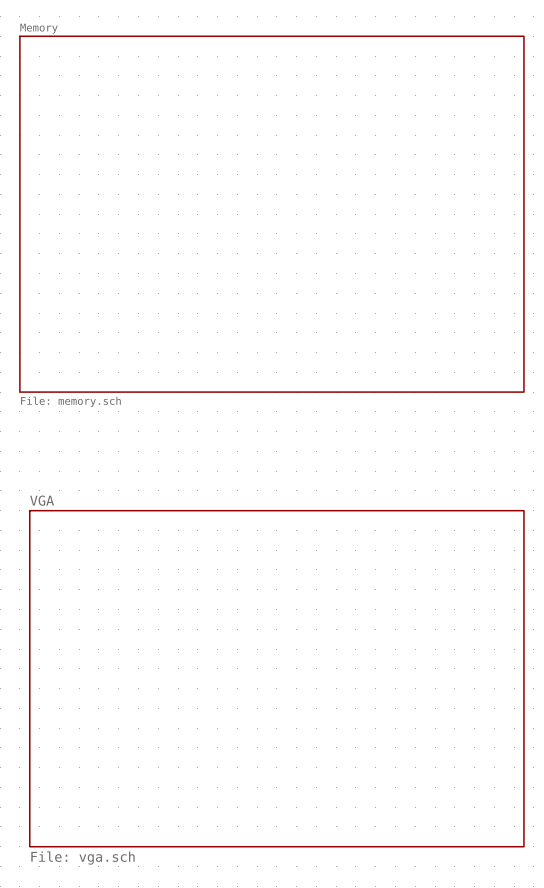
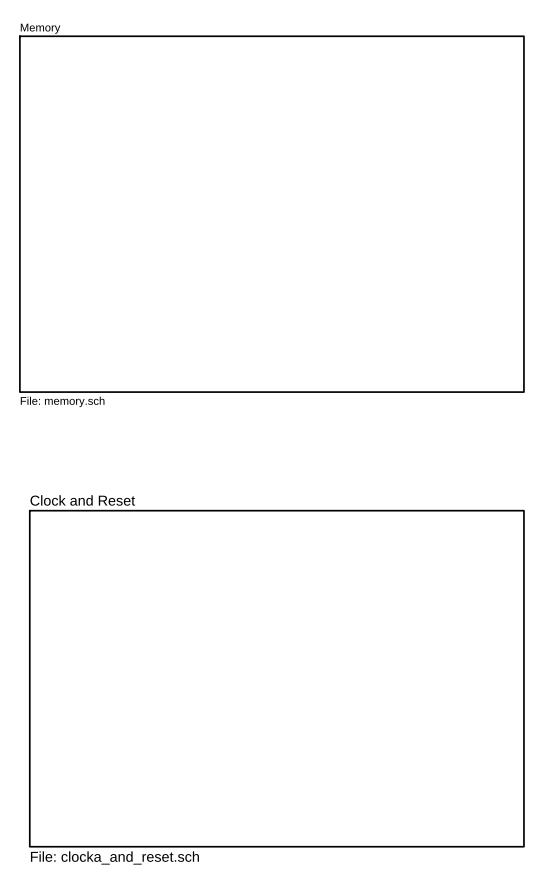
sheet VGA name: VGA (42, 500) -> Clock and Reset (82, 500)
sheet VGA value: File: vga.sch (82, 858) -> File: clocka_and_reset.sch (114, 857)

